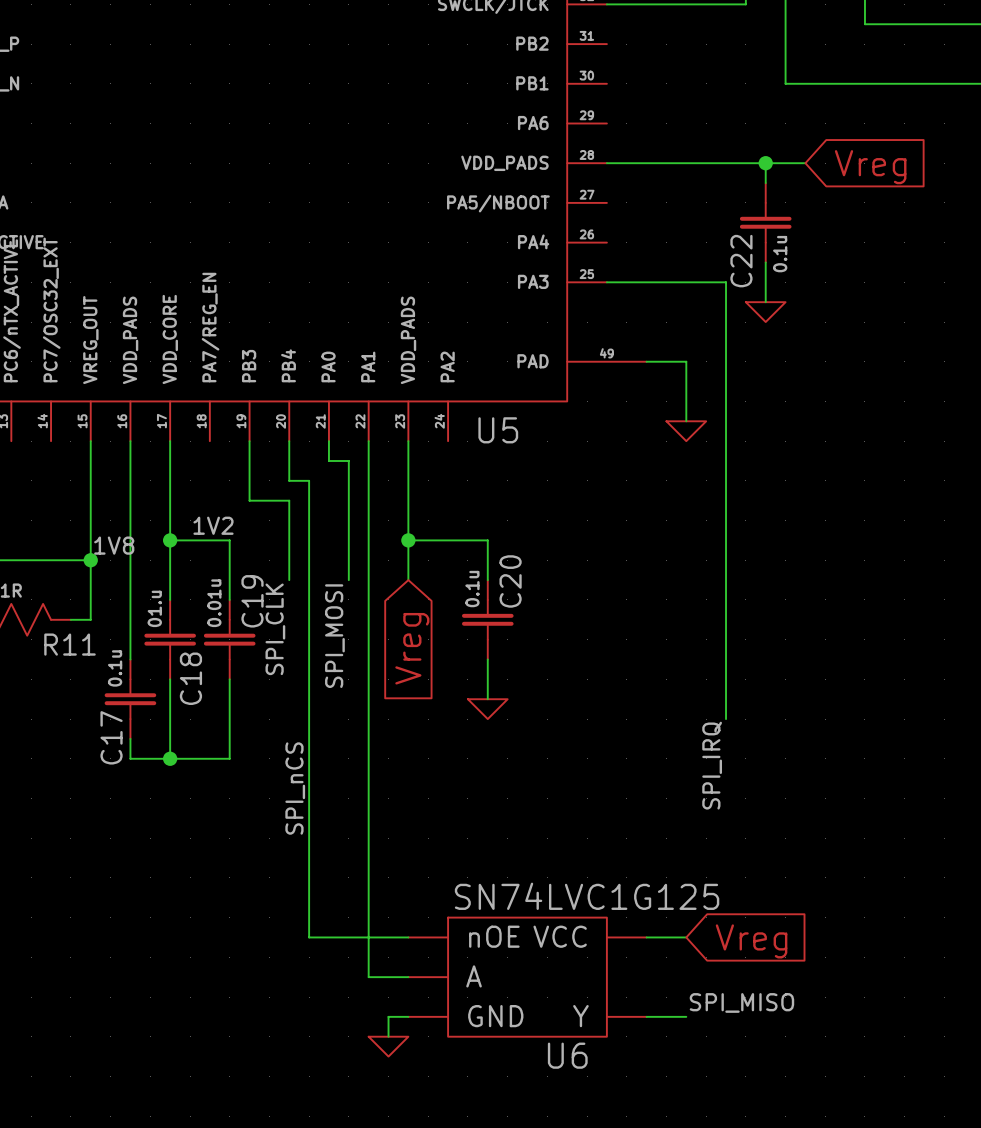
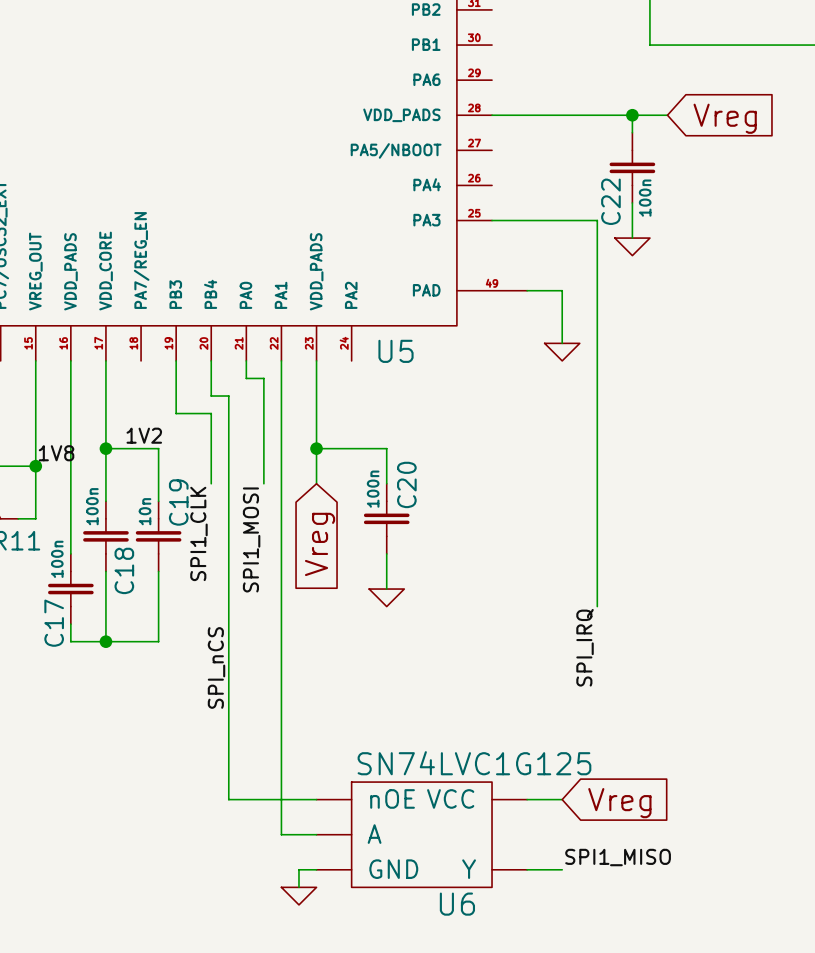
C22 value: 0.1u (780, 254) -> 100n (645, 198)
C20 value: 0.1u (472, 589) -> 100n (373, 489)
C19 value: 0.01u (214, 603) -> 10n (145, 511)
C18 value: 01.u (154, 608) -> 100n (92, 506)
label: SPI_CLK (275, 629) -> SPI1_CLK (198, 533)
label: SPI_MOSI (334, 636) -> SPI1_MOSI (251, 539)
C17 value: 0.1u (115, 668) -> 100n (57, 559)
label: SPI_MISO (741, 1002) -> SPI1_MISO (618, 857)

